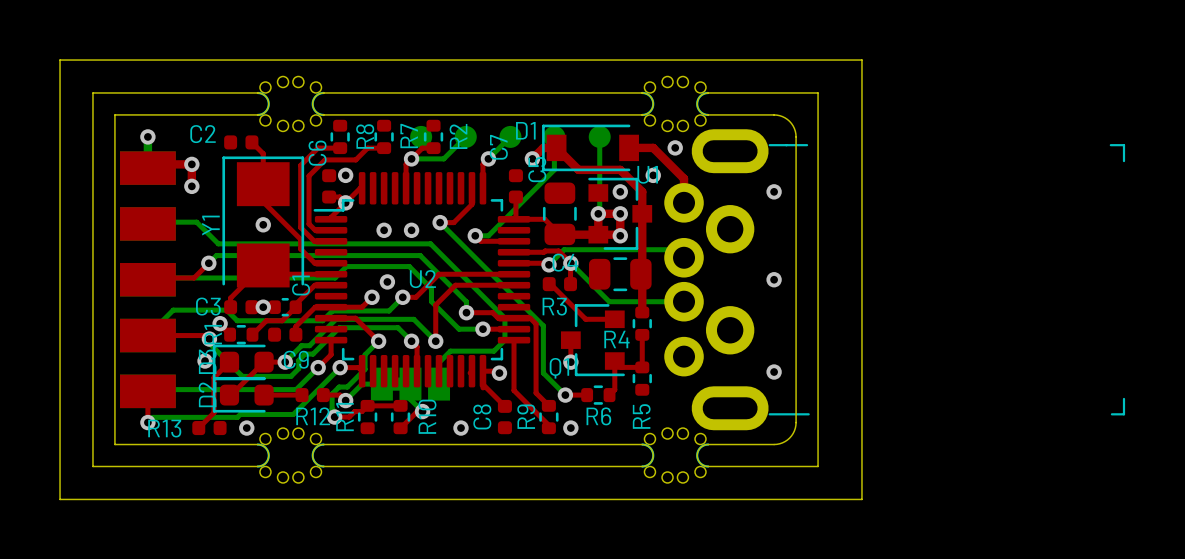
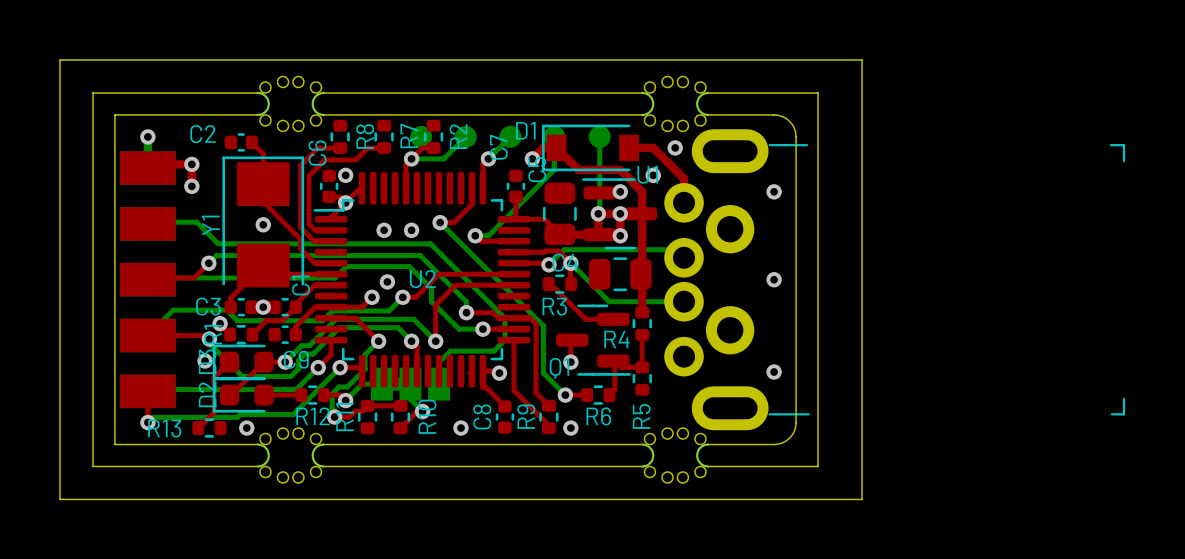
C2 footprint: [224, 135, 259, 150] -> [224, 133, 258, 152]
C6 footprint: [322, 169, 337, 204] -> [319, 169, 339, 204]
C7 footprint: [508, 169, 523, 204] -> [506, 169, 526, 204]
U1 footprint: [588, 177, 653, 250] -> [582, 178, 658, 250]
R3 footprint: [542, 277, 578, 292] -> [542, 274, 578, 294]
C3 footprint: [224, 300, 259, 315] -> [224, 297, 258, 317]
Q1 footprint: [560, 304, 625, 377] -> [556, 304, 631, 376]
C9 footprint: [268, 327, 303, 342] -> [268, 325, 302, 344]
R12 footprint: [295, 388, 330, 403] -> [295, 385, 330, 405]
C8 footprint: [497, 399, 512, 435] -> [495, 400, 515, 434]
R13 footprint: [192, 421, 227, 436] -> [192, 418, 227, 438]

